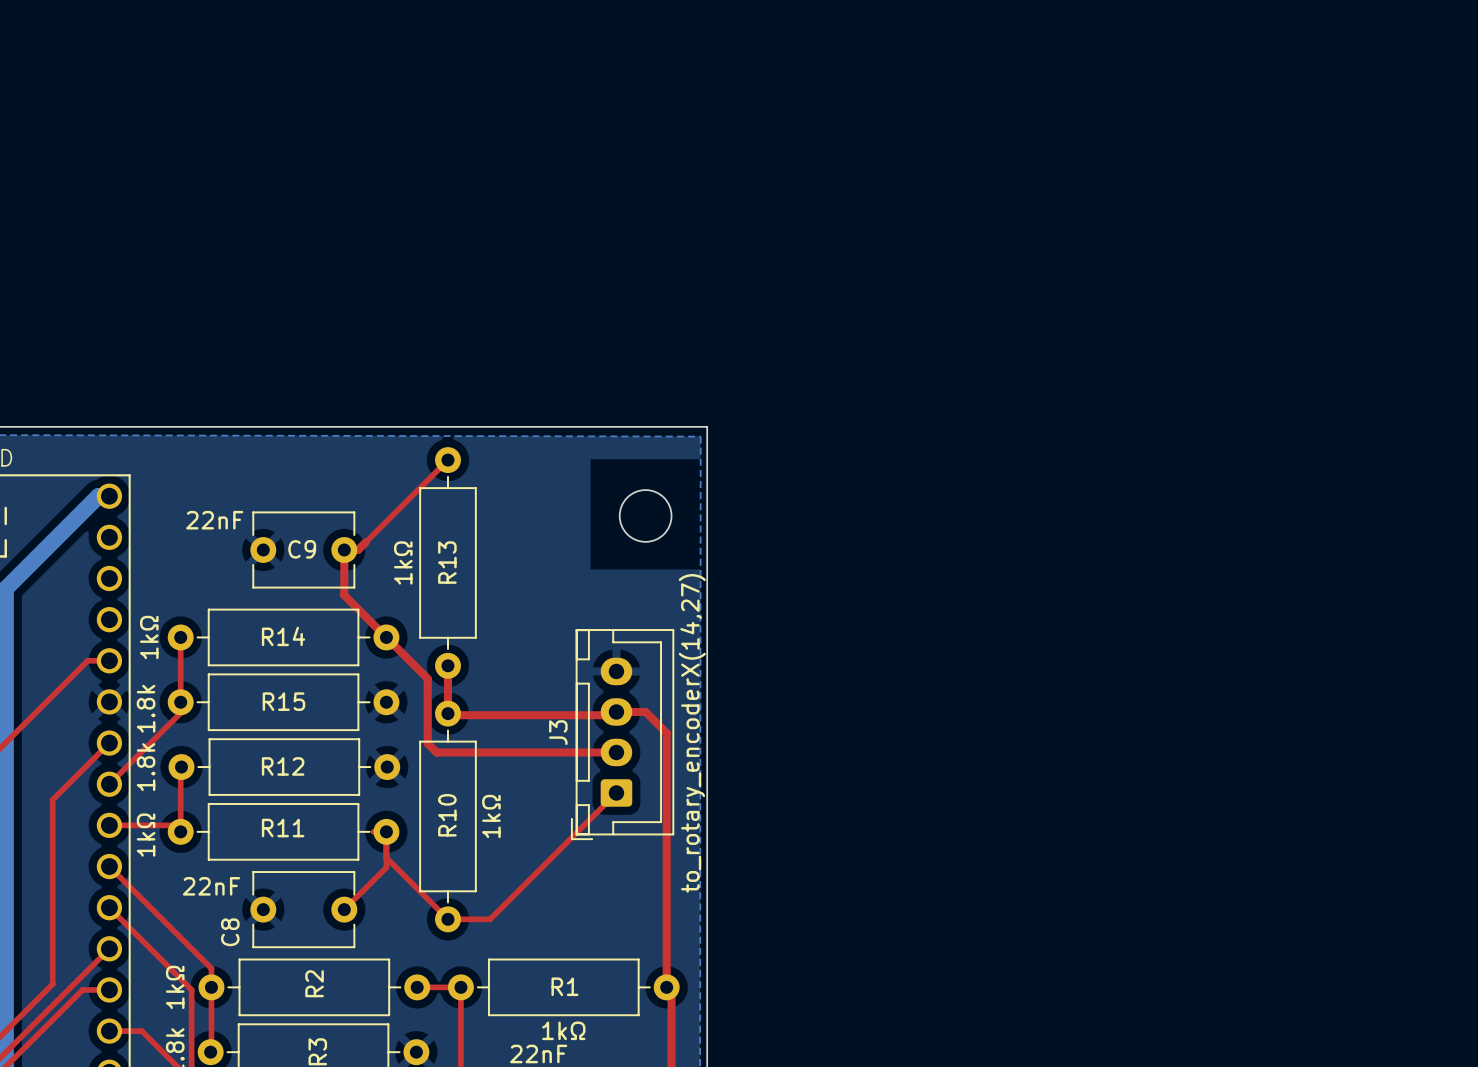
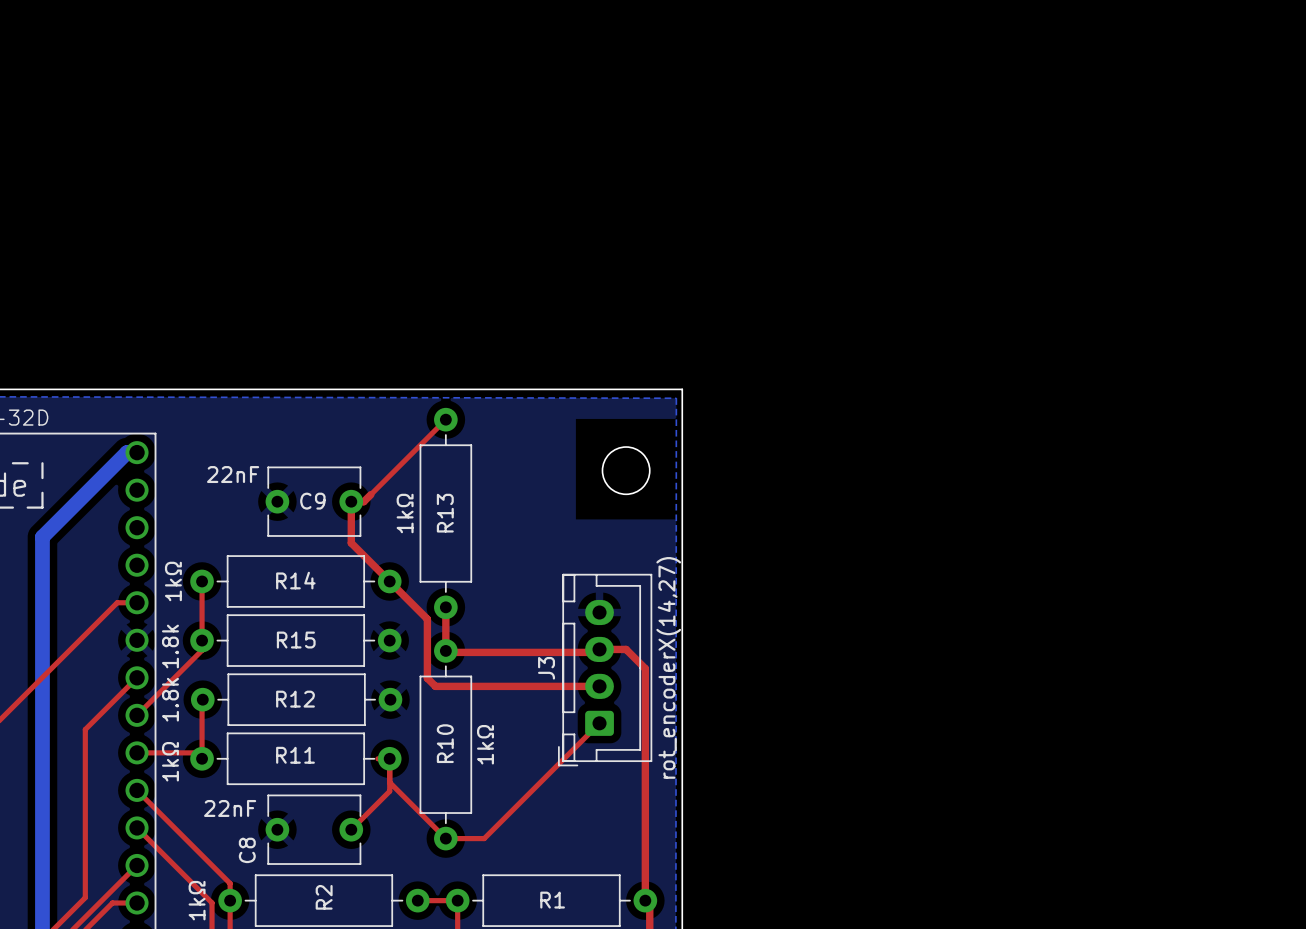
J3 value: to_rotary_encoderX(14,27) (692, 733) -> rot_encoderX(14,27) (668, 667)

